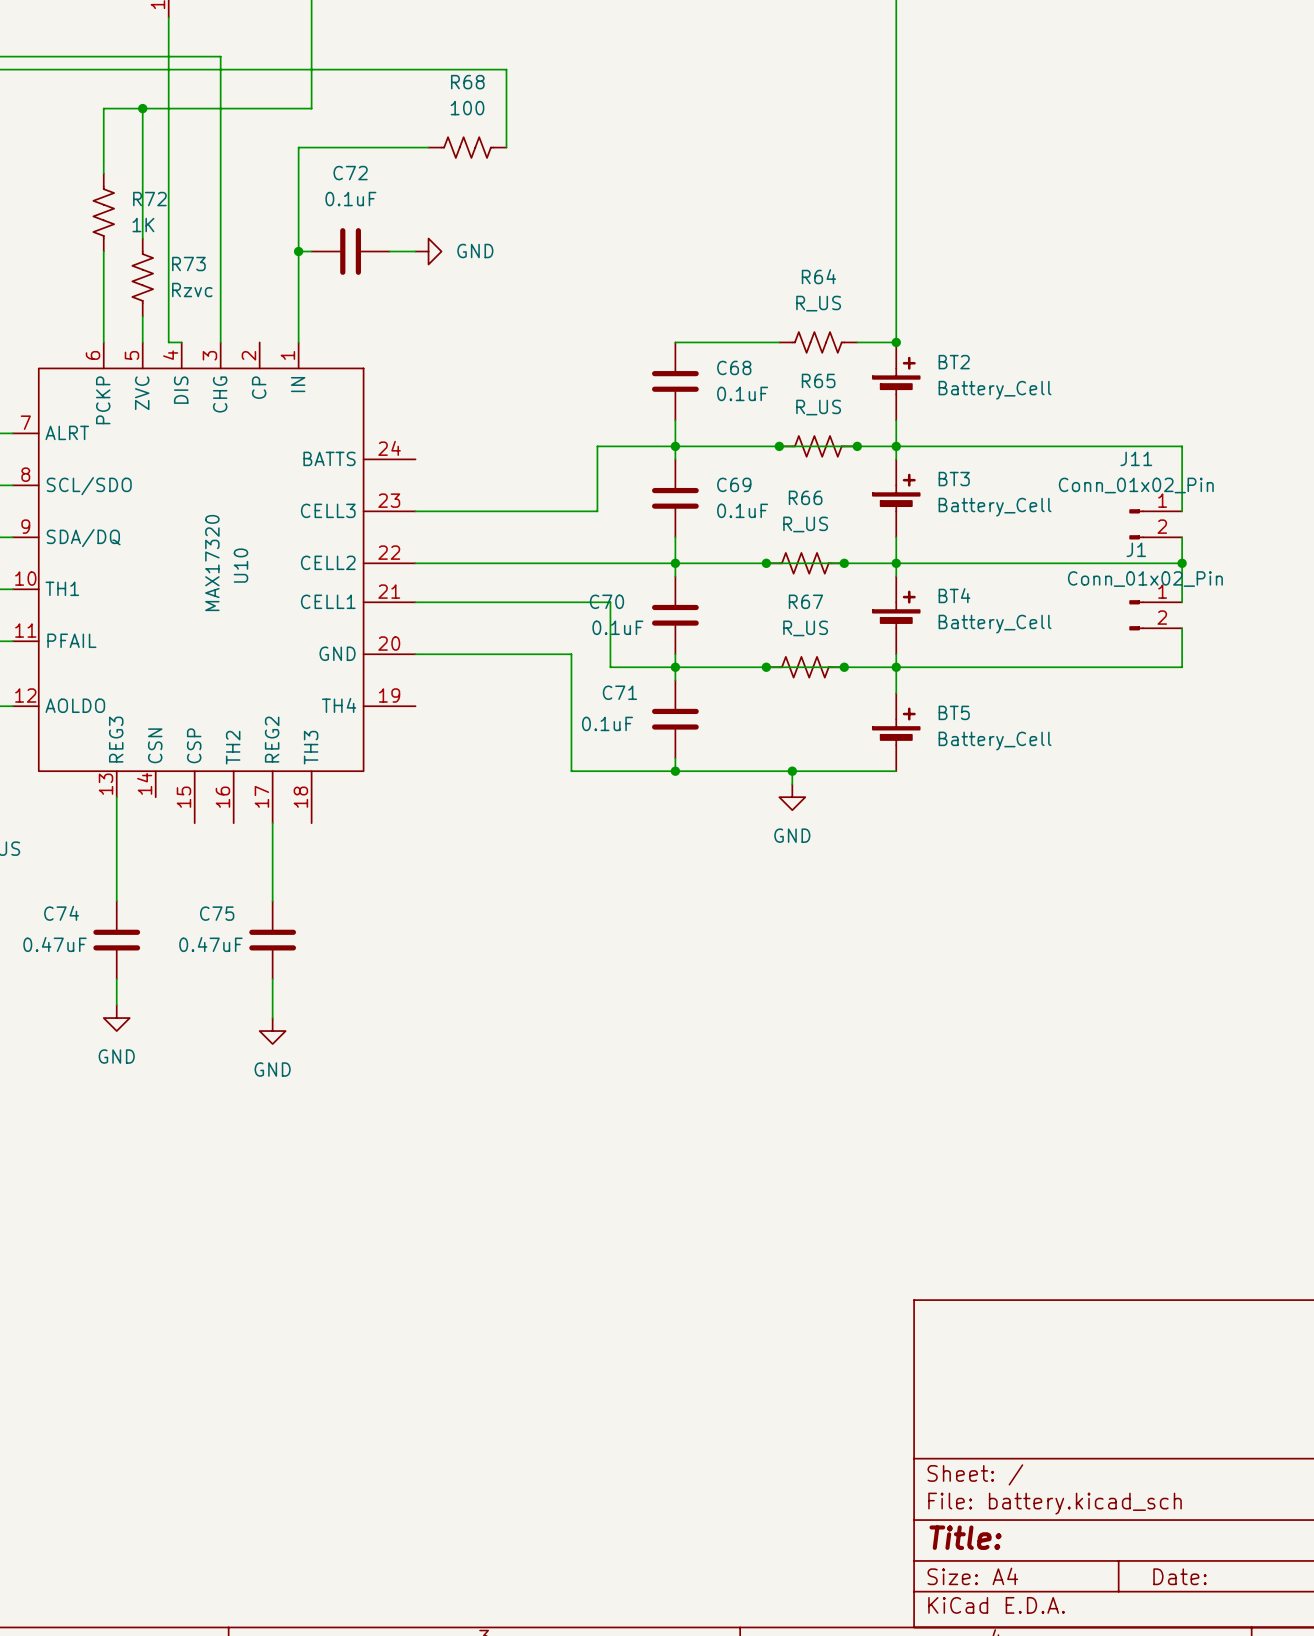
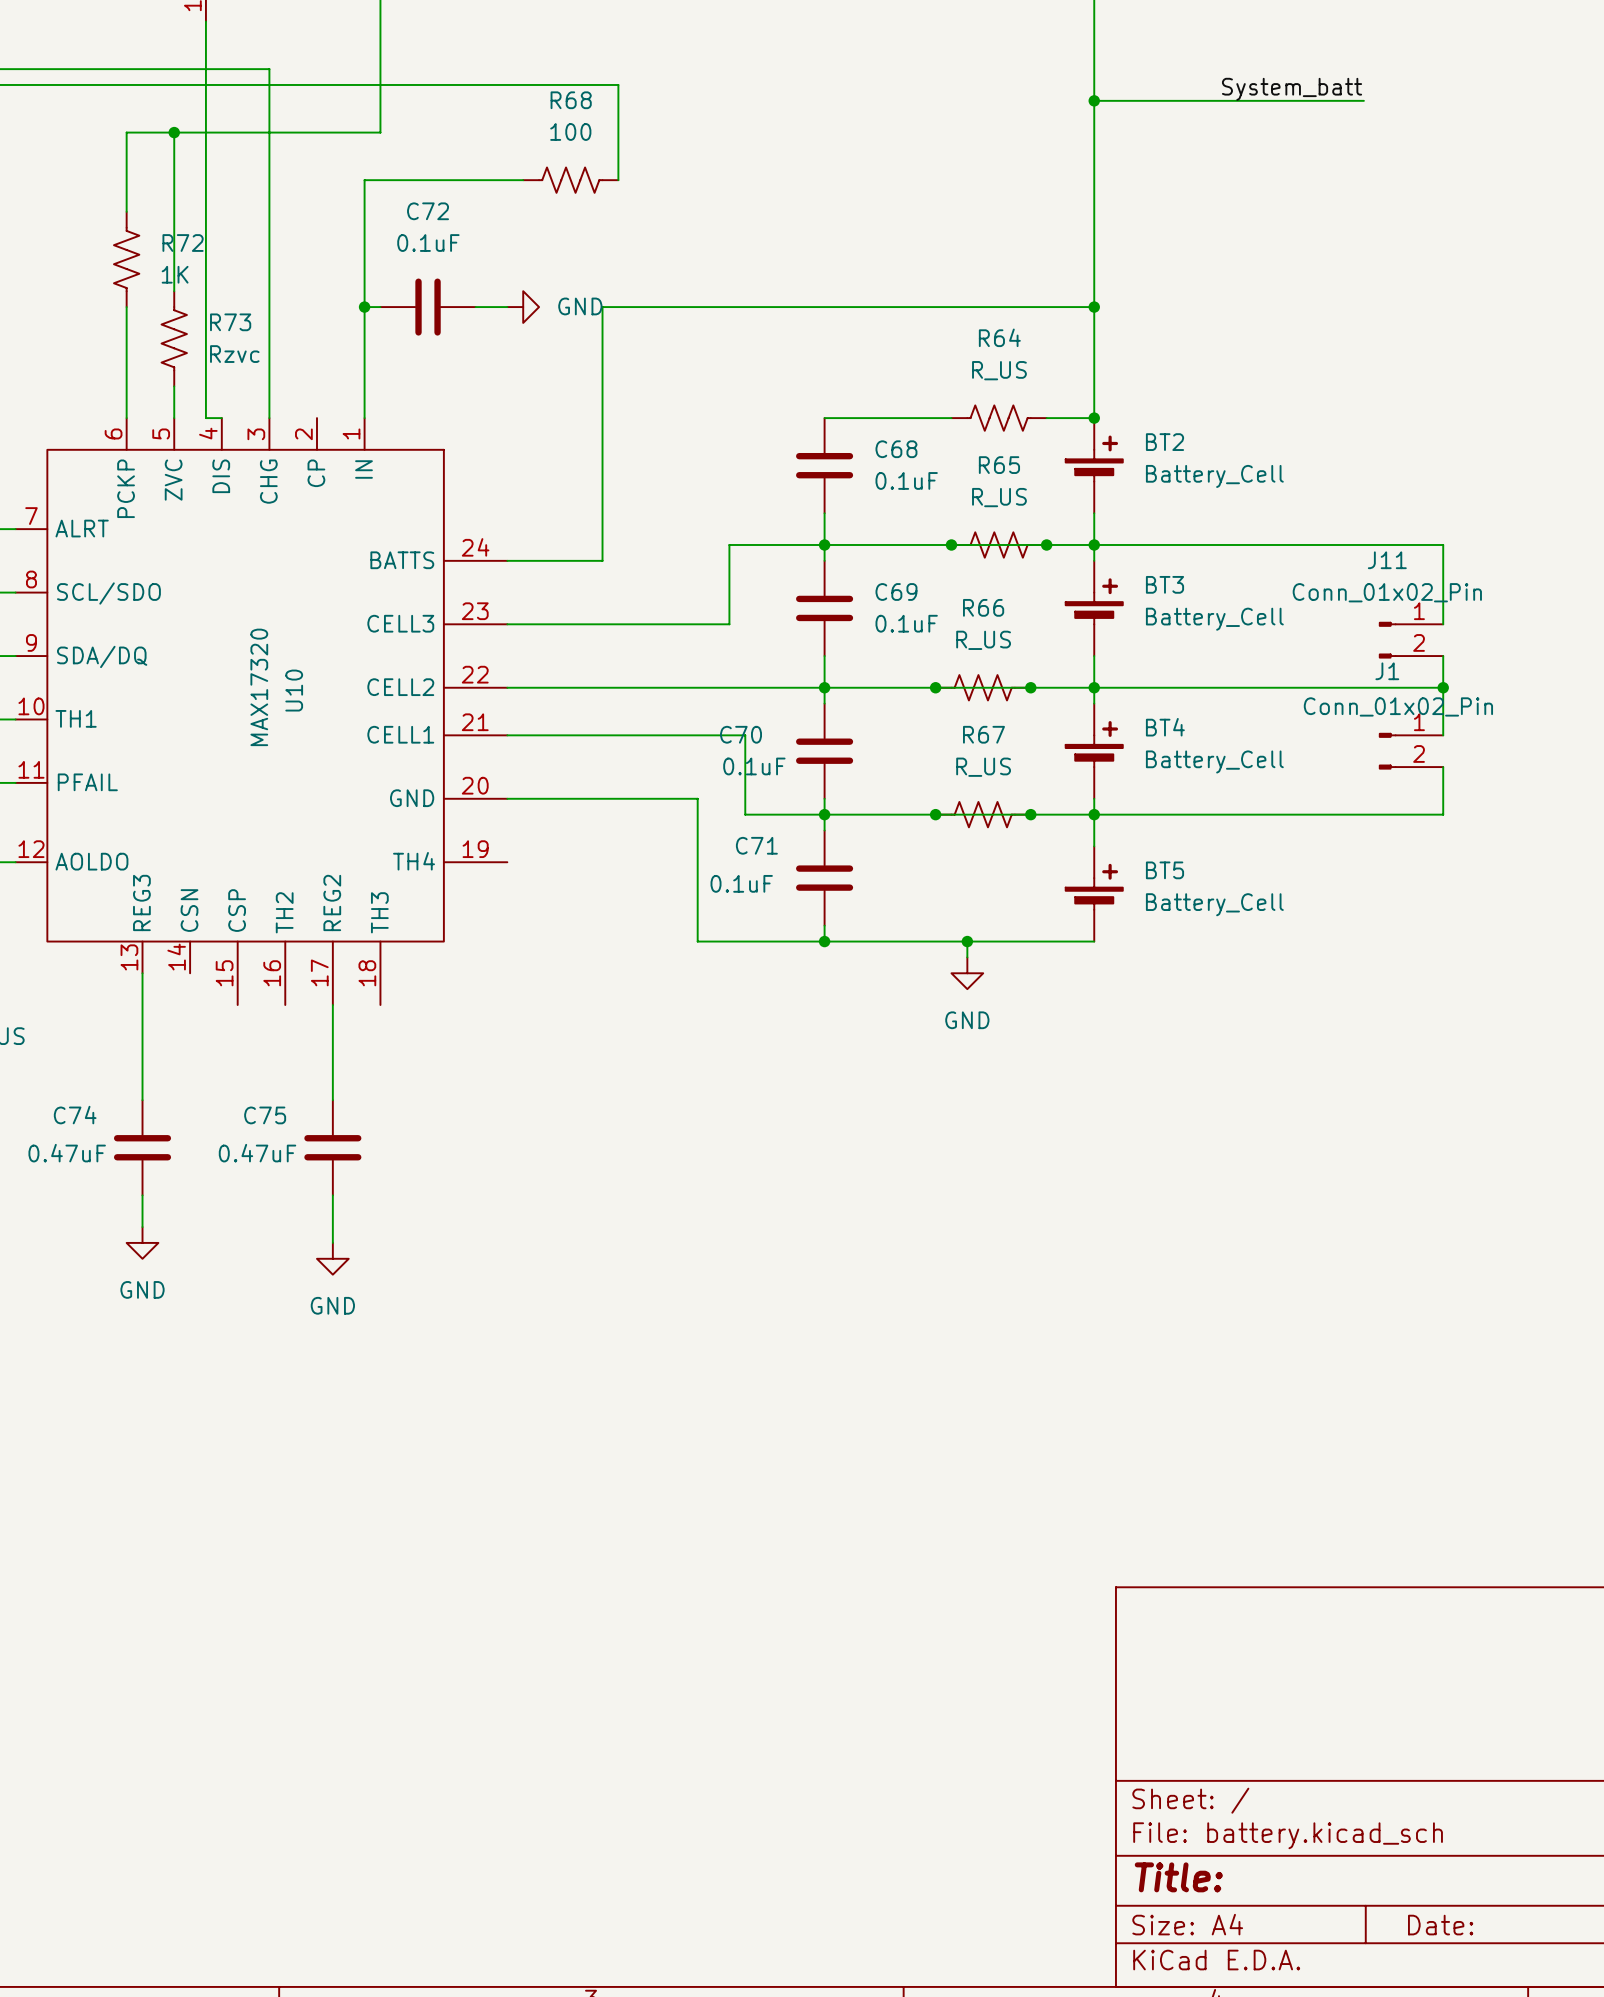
label: none -> System_batt (1292, 89)
wire: none -> (1094, 100) (1363, 100)
junction: none -> (1094, 100)
wire: none -> (1094, 307) (602, 307) (602, 560) (507, 560)
junction: none -> (1094, 307)

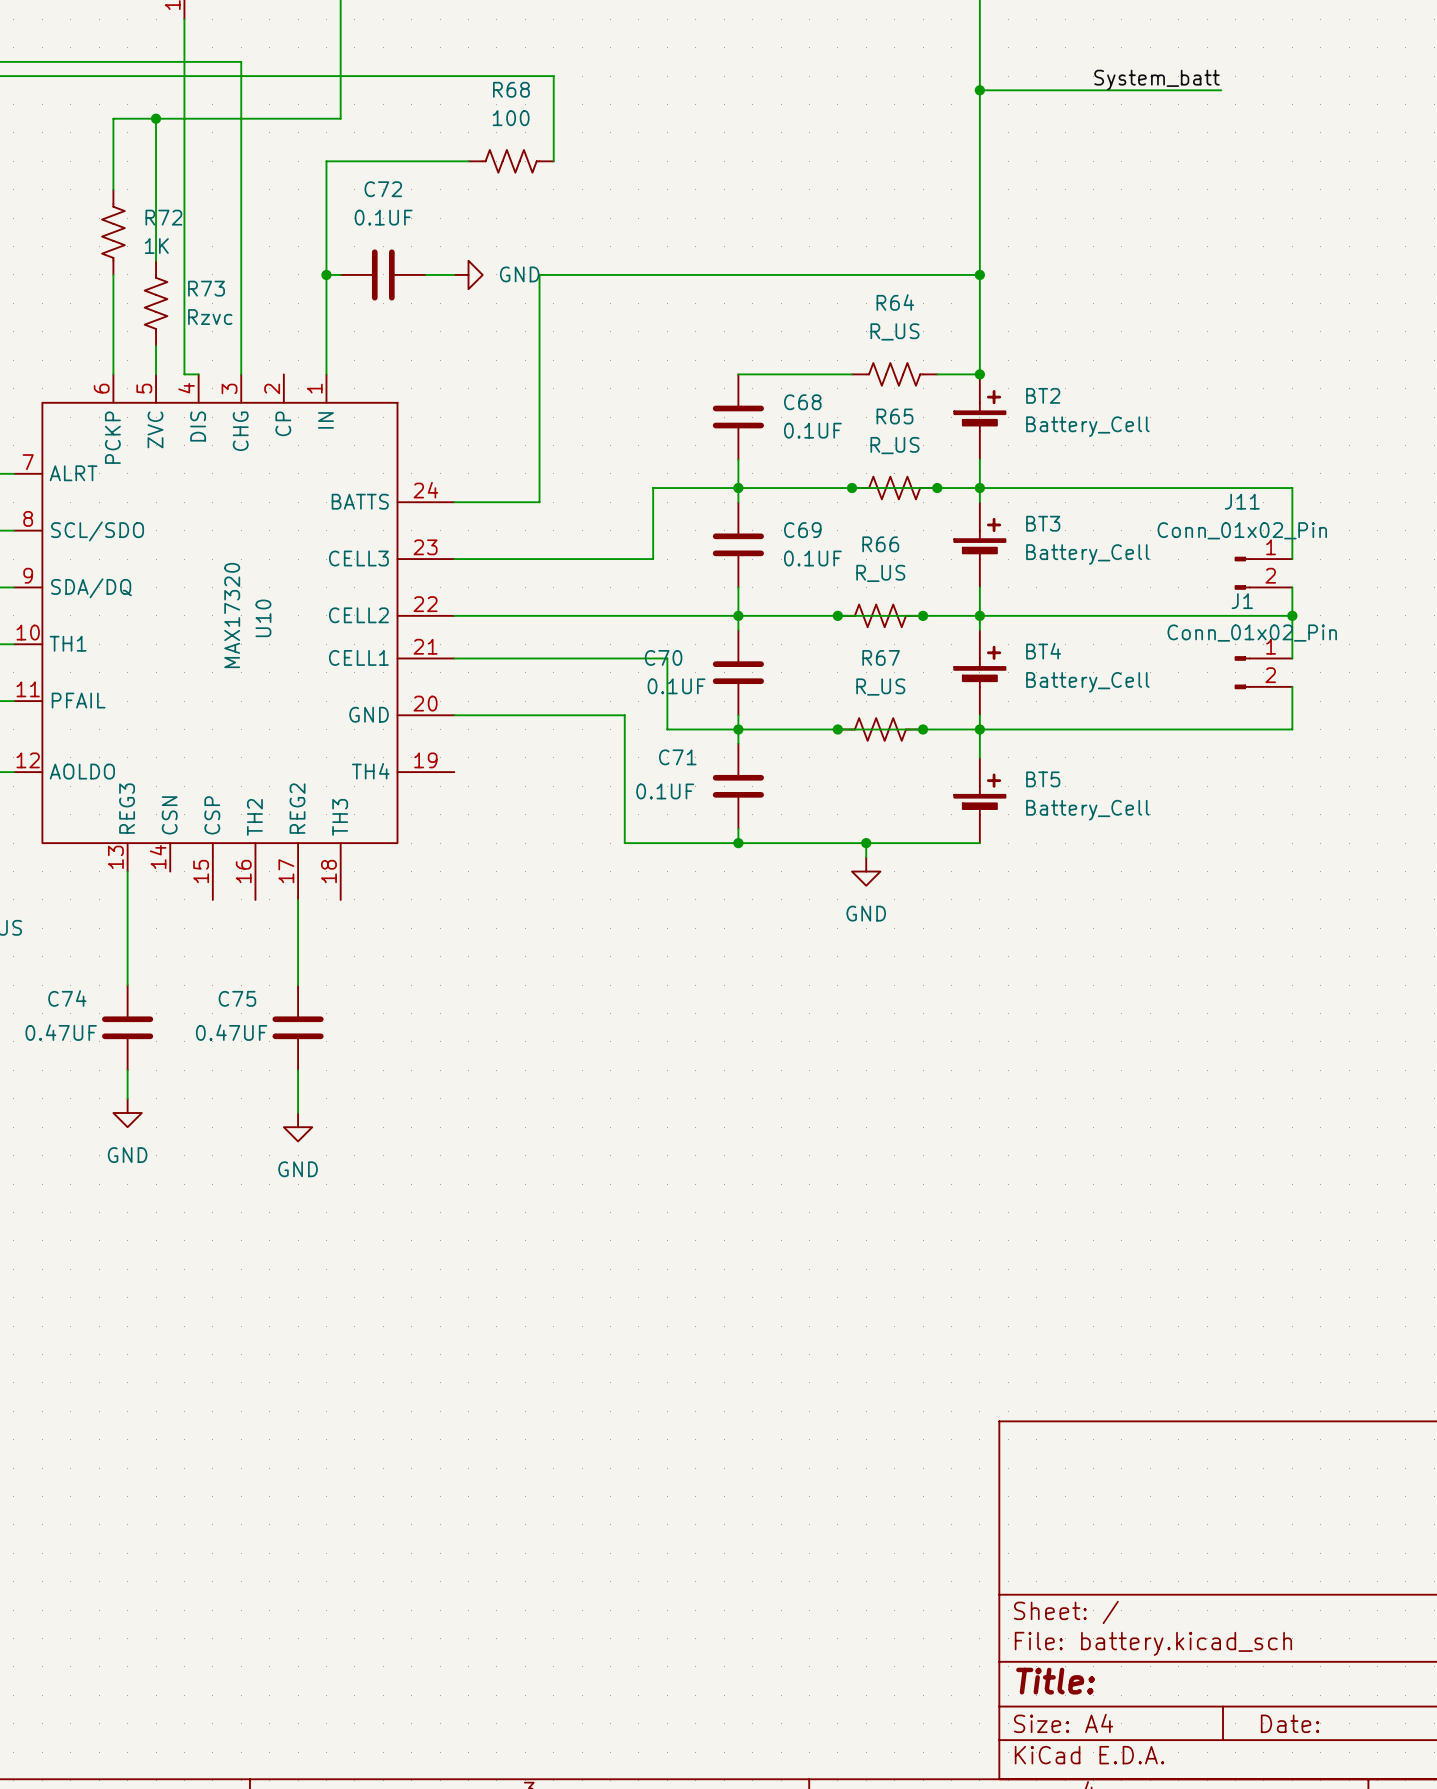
C72 value: 0.1uF (428, 243) -> 0.1UF (383, 217)
C68 value: 0.1uF (906, 480) -> 0.1UF (812, 430)
C69 value: 0.1uF (906, 623) -> 0.1UF (812, 558)
C70 value: 0.1uF (754, 766) -> 0.1UF (676, 686)
C71 value: 0.1uF (741, 883) -> 0.1UF (665, 791)
C74 value: 0.47uF (67, 1153) -> 0.47UF (61, 1032)
C75 value: 0.47uF (257, 1153) -> 0.47UF (231, 1032)

